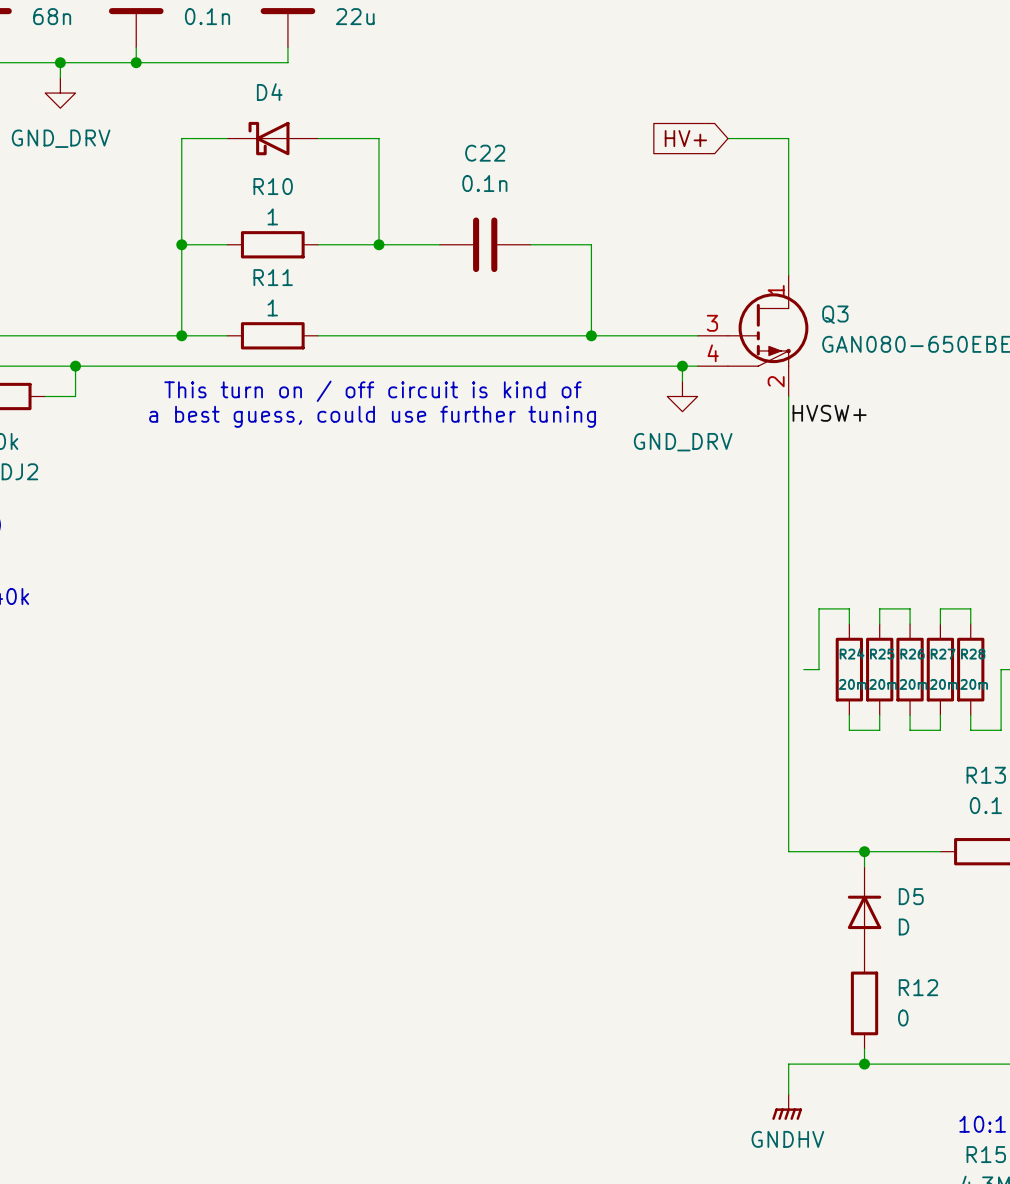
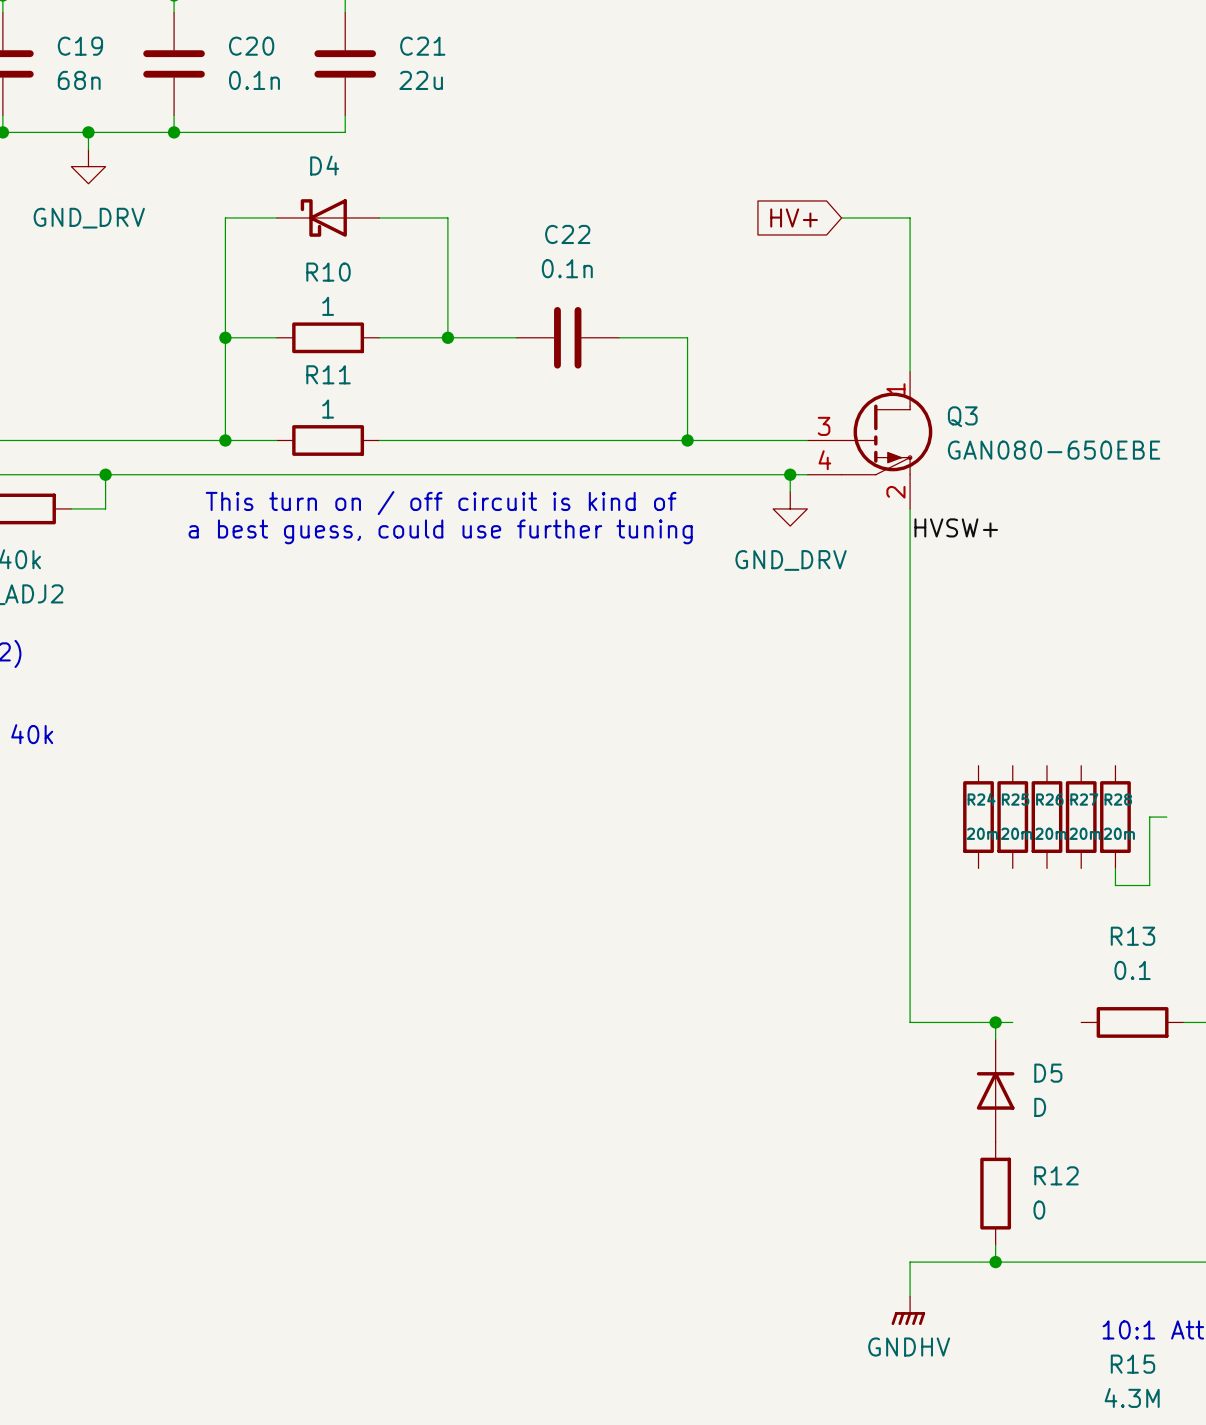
wire: (849, 624) (849, 608) (819, 608) (819, 669) (803, 669) -> none
wire: (879, 624) (879, 608) (910, 608) (910, 624) -> none
wire: (940, 624) (940, 608) (970, 608) (970, 624) -> none
wire: (849, 715) (849, 730) (879, 730) (879, 715) -> none
wire: (910, 715) (910, 730) (940, 730) (940, 715) -> none
wire: (879, 851) (940, 851) -> none

